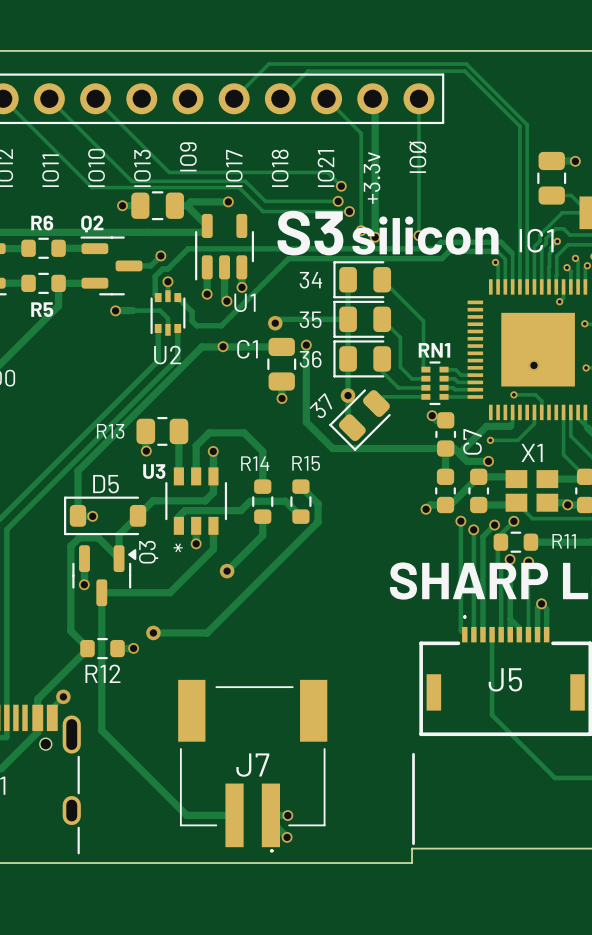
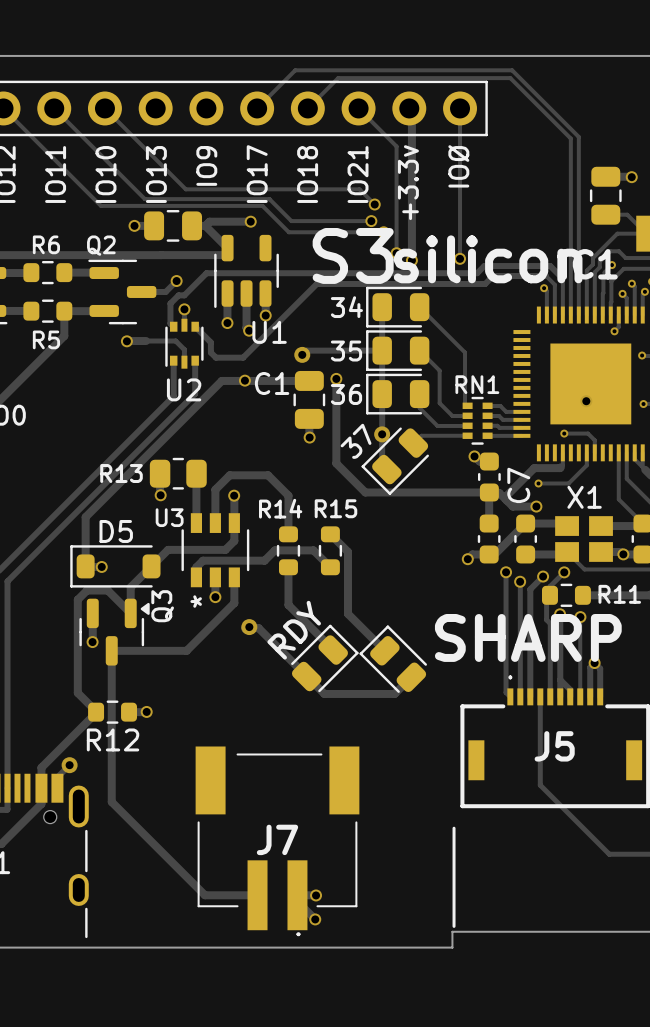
track: (316, 502) (318, 522) (207, 632) (153, 632) -> (347, 551) (347, 613) (384, 650)
track: (262, 535) (227, 571) -> (288, 587) (288, 605) (334, 651)
track: none -> (245, 629) (258, 628) (324, 693) (394, 693) (411, 677)
text: none -> RDY (294, 630)
part: none -> (324, 658)
part: none -> (393, 659)
via: (153, 632) -> none

